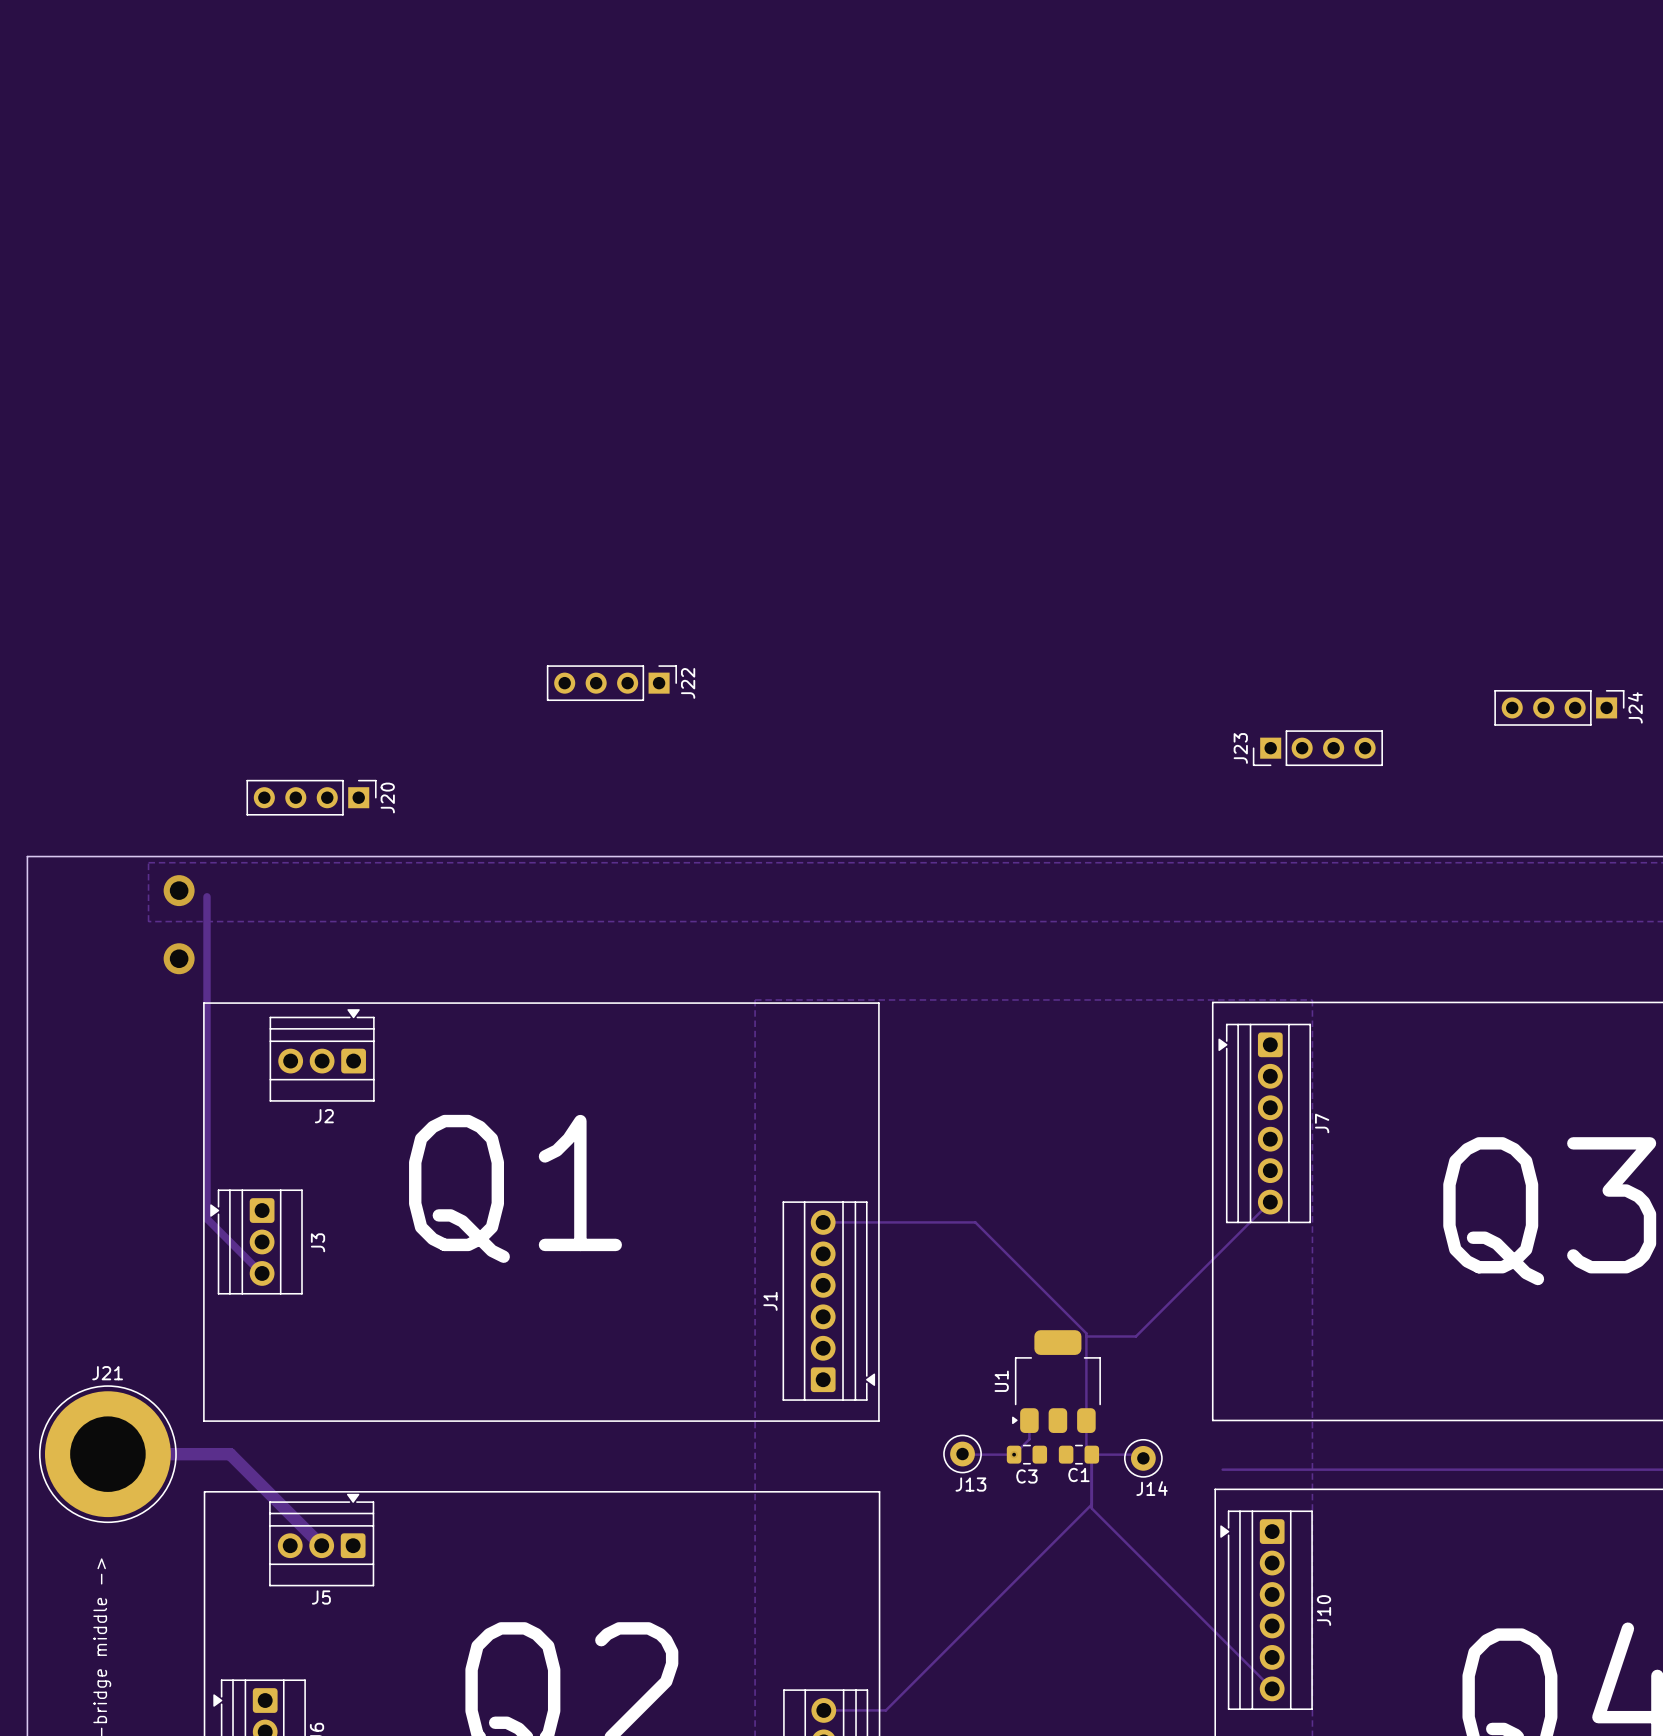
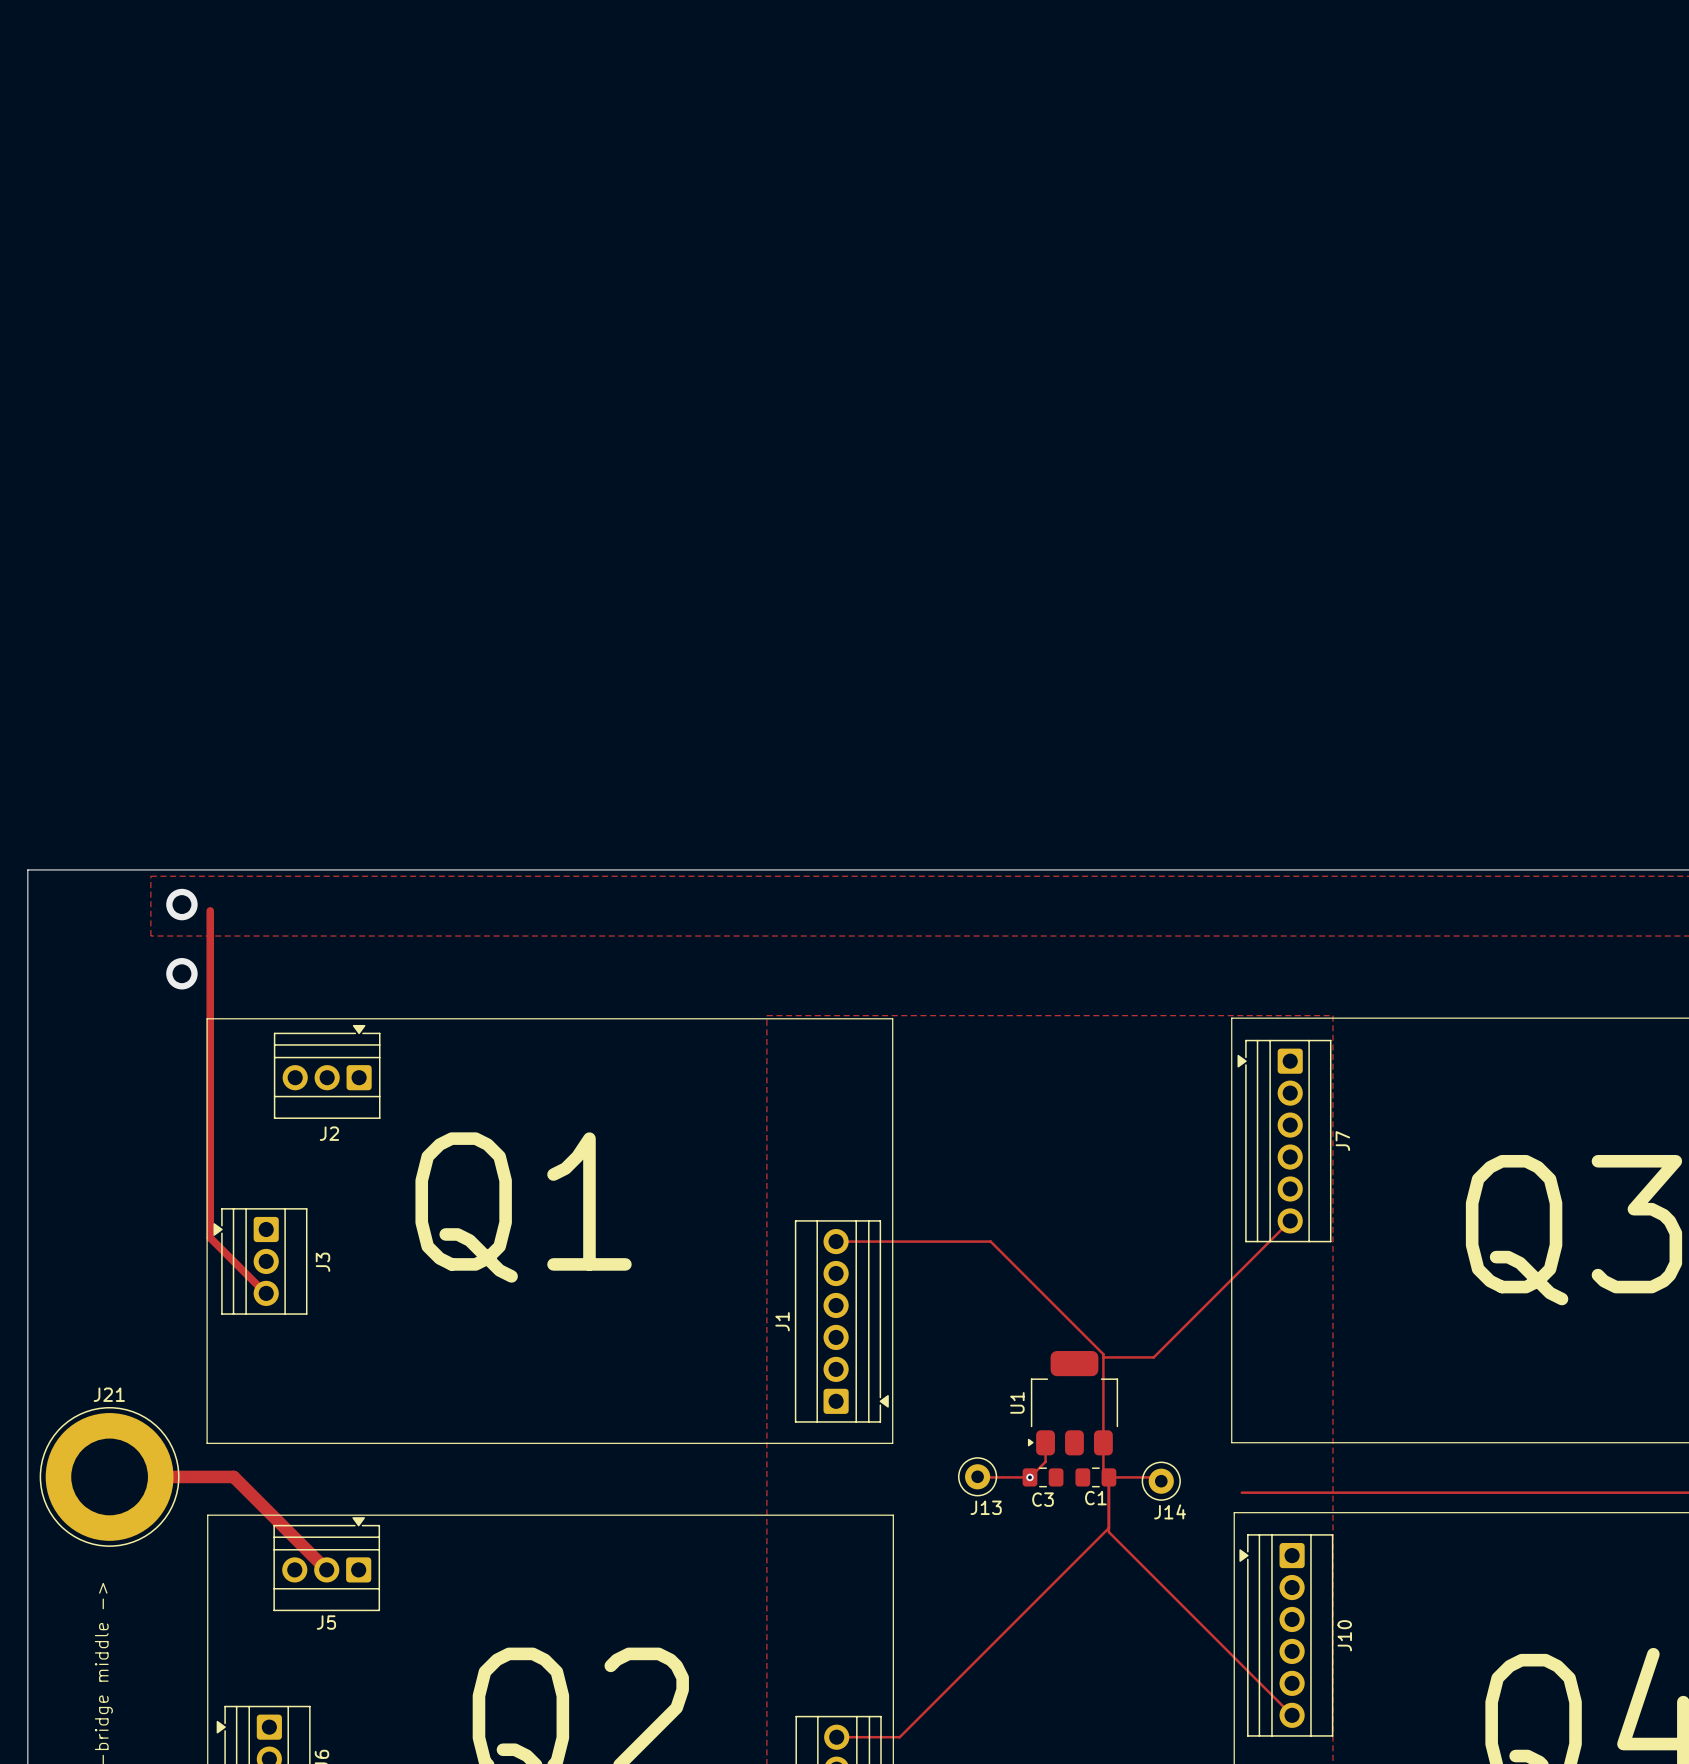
J22: (611, 683) -> none
J24: (1559, 707) -> none
J23: (1317, 748) -> none
J20: (311, 797) -> none

